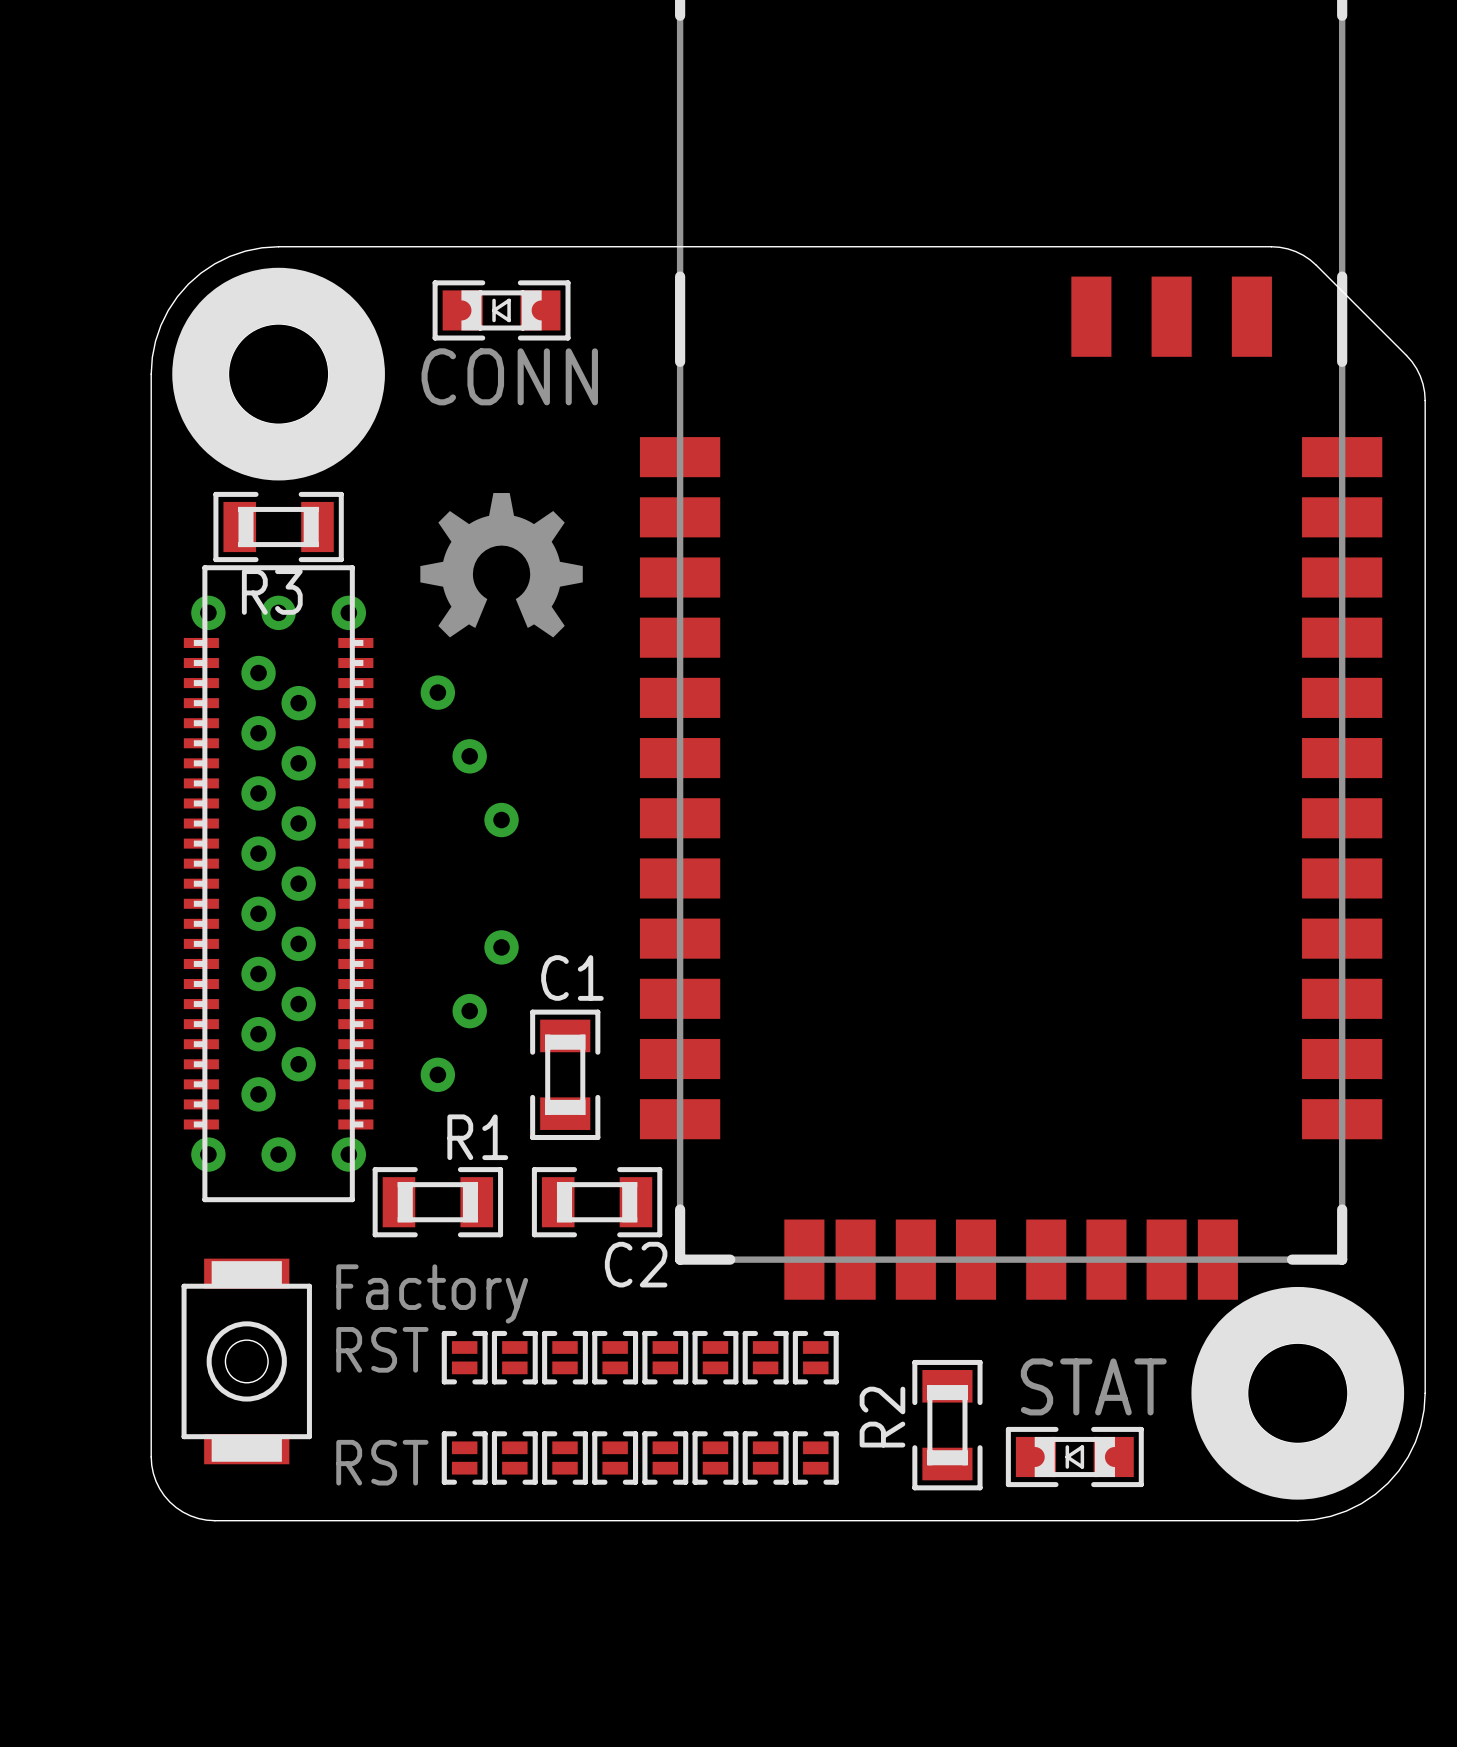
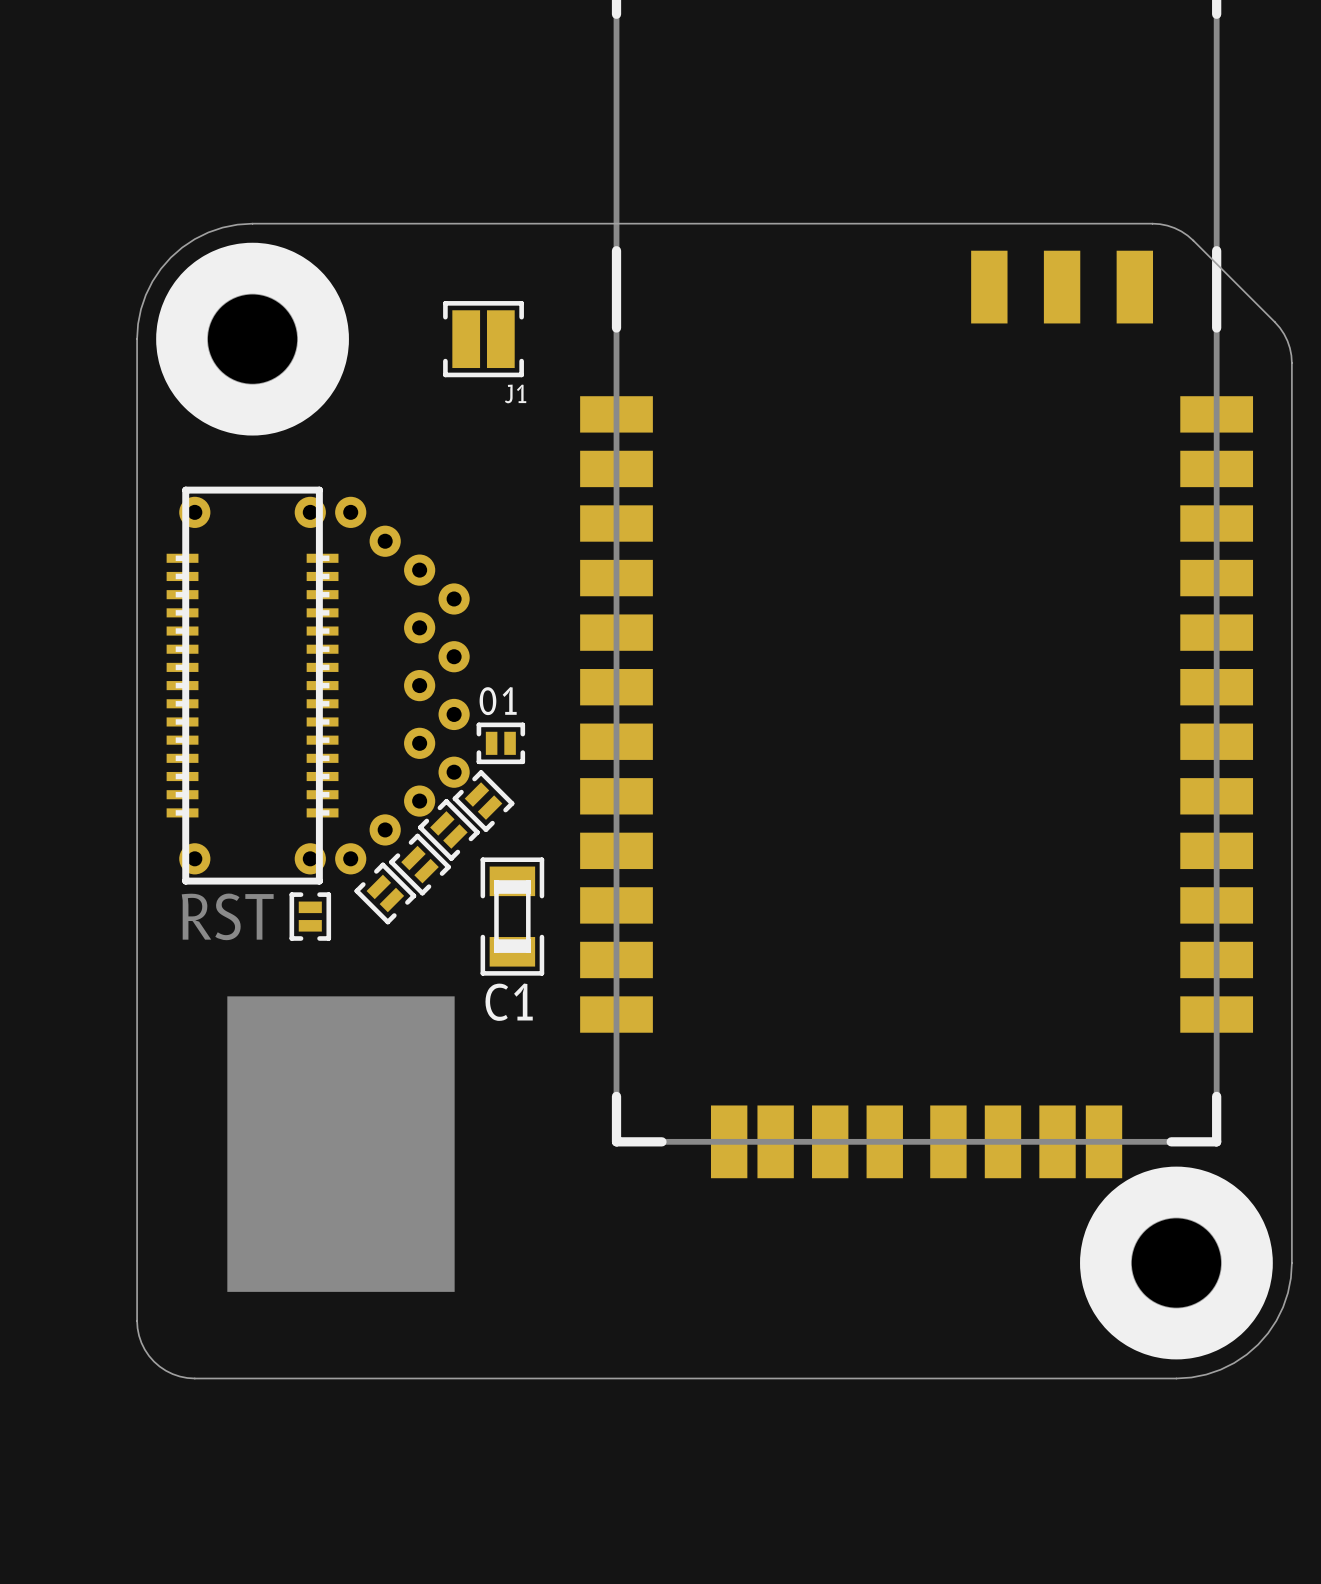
part: (501, 310) -> none
J1: none -> (483, 339)
text: CONN (509, 376) -> none
drawing: [420, 493, 583, 638] -> none
R3: (278, 527) -> none
part: none -> (318, 685)
01: none -> (500, 743)
part: (351, 883) -> none
part: none -> (483, 801)
part: none -> (448, 829)
part: none -> (420, 864)
C1 name position: C1 (572, 977) -> C1 (509, 1002)
part: none -> (385, 893)
text: none -> RST (227, 916)
part: none -> (310, 916)
C1 position: (565, 1074) -> (512, 916)
drawing: none -> [227, 996, 455, 1292]
R1: (437, 1202) -> none
C2: (597, 1202) -> none
text: Factory (432, 1293) -> none
text: RST (382, 1349) -> none
part: (464, 1357) -> none
part: (514, 1357) -> none
part: (565, 1357) -> none
part: (615, 1357) -> none
part: (665, 1357) -> none
part: (715, 1357) -> none
part: (765, 1357) -> none
part: (815, 1357) -> none
part: (246, 1361) -> none
text: STAT (1093, 1386) -> none
R2: (947, 1425) -> none
part: (1074, 1456) -> none
part: (464, 1458) -> none
part: (514, 1458) -> none
part: (565, 1458) -> none
part: (615, 1458) -> none
part: (665, 1458) -> none
part: (715, 1458) -> none
part: (765, 1458) -> none
part: (815, 1458) -> none
text: RST (382, 1462) -> none

